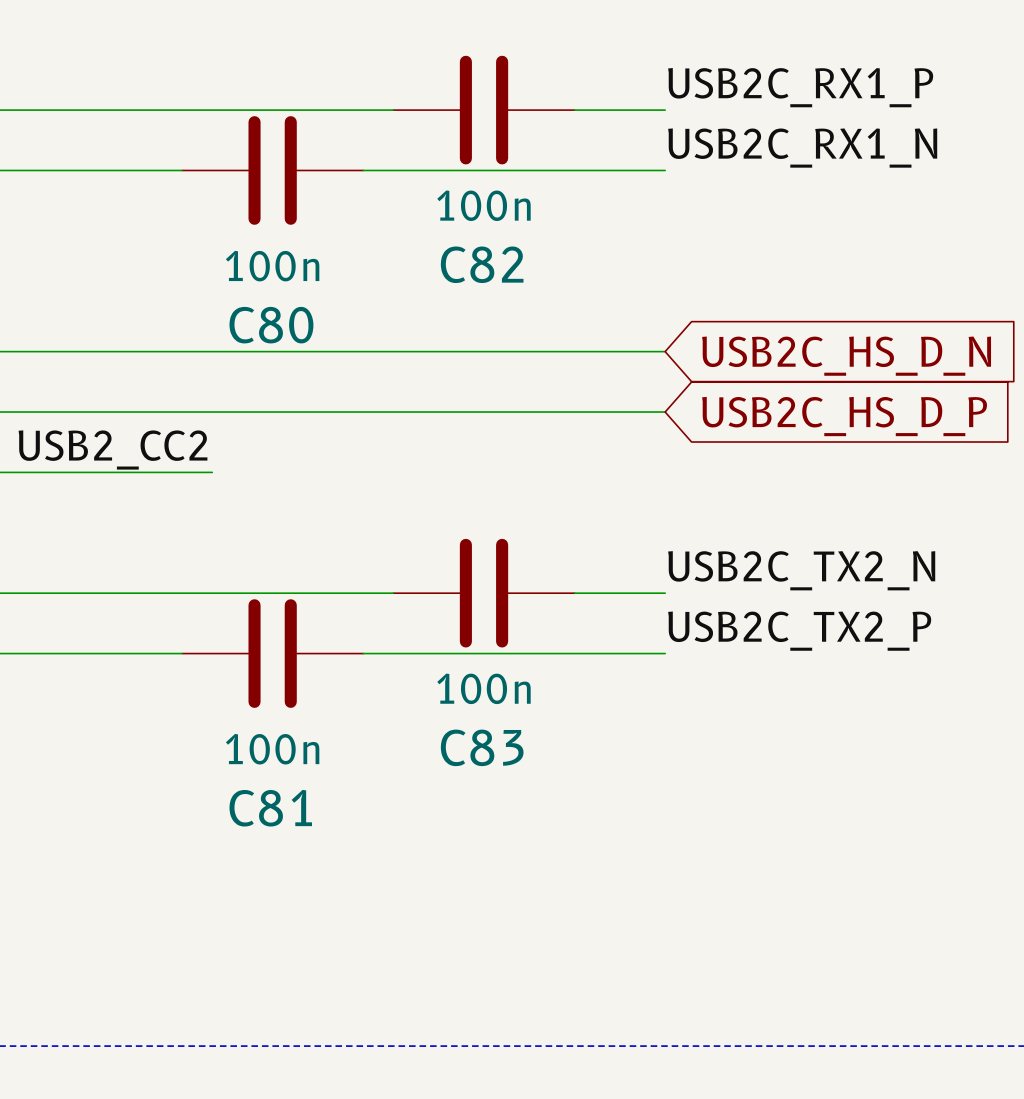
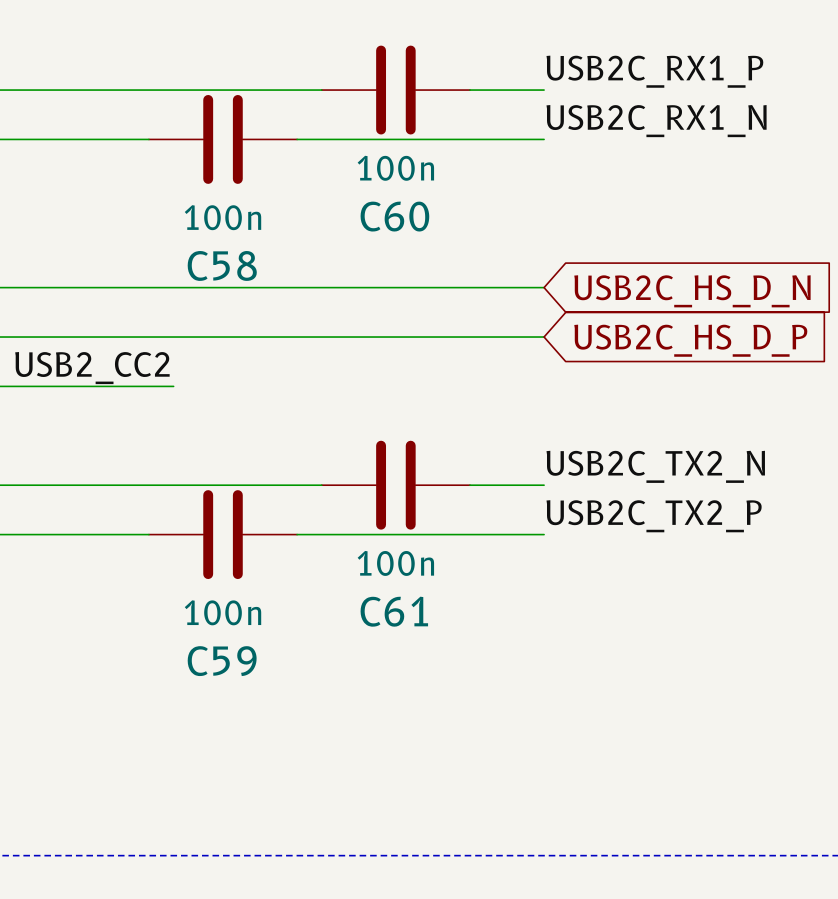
C82 name: C82 (482, 264) -> C60 (394, 216)
C80 name: C80 (271, 325) -> C58 (222, 265)
C83 name: C83 (482, 747) -> C61 (394, 611)
C81 name: C81 (270, 808) -> C59 (222, 661)

